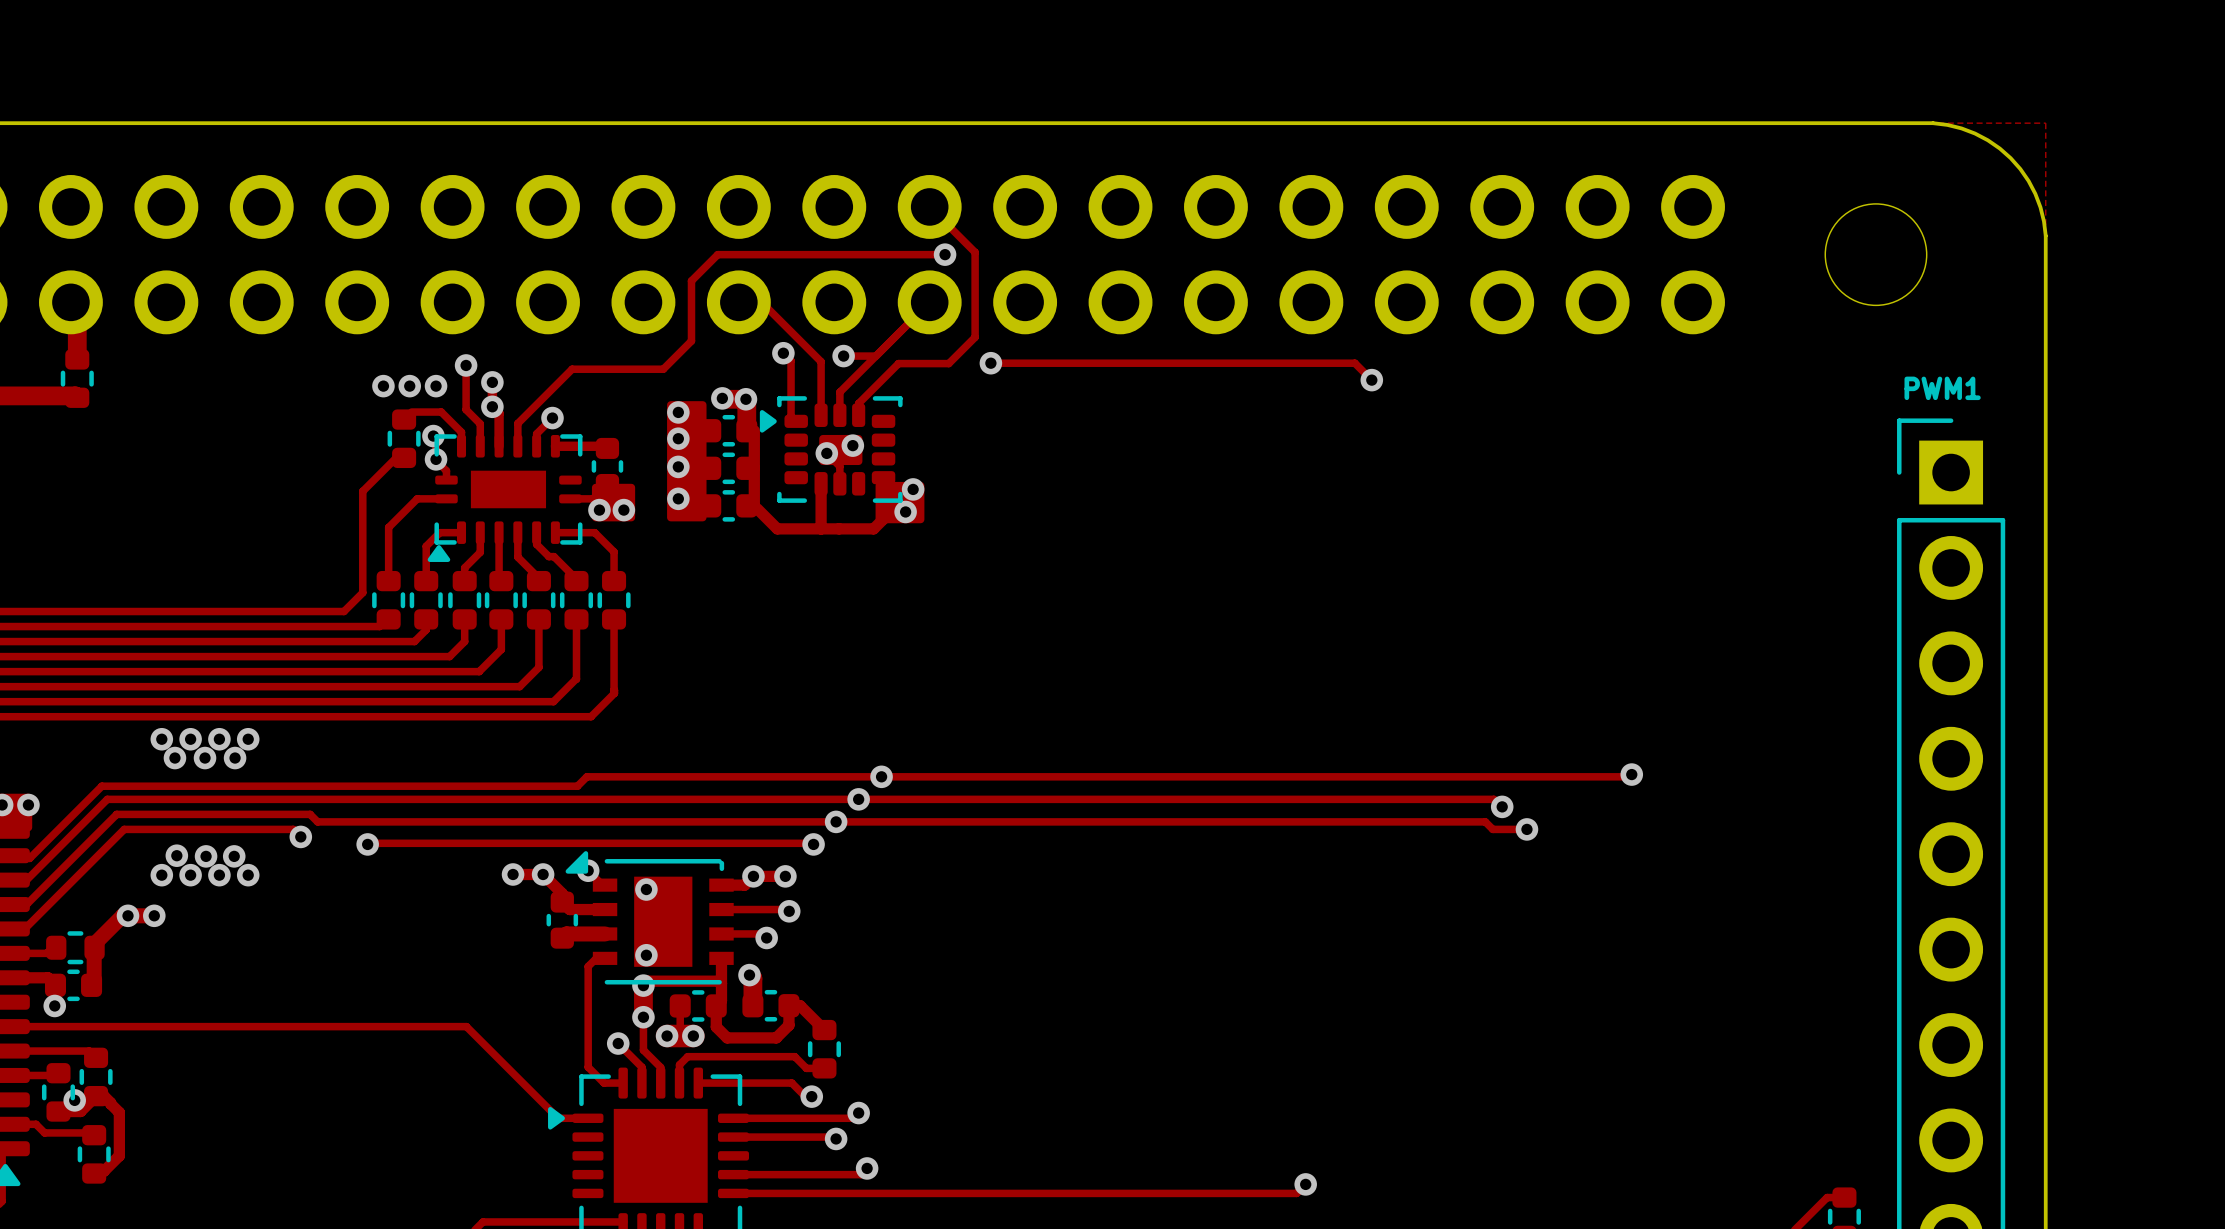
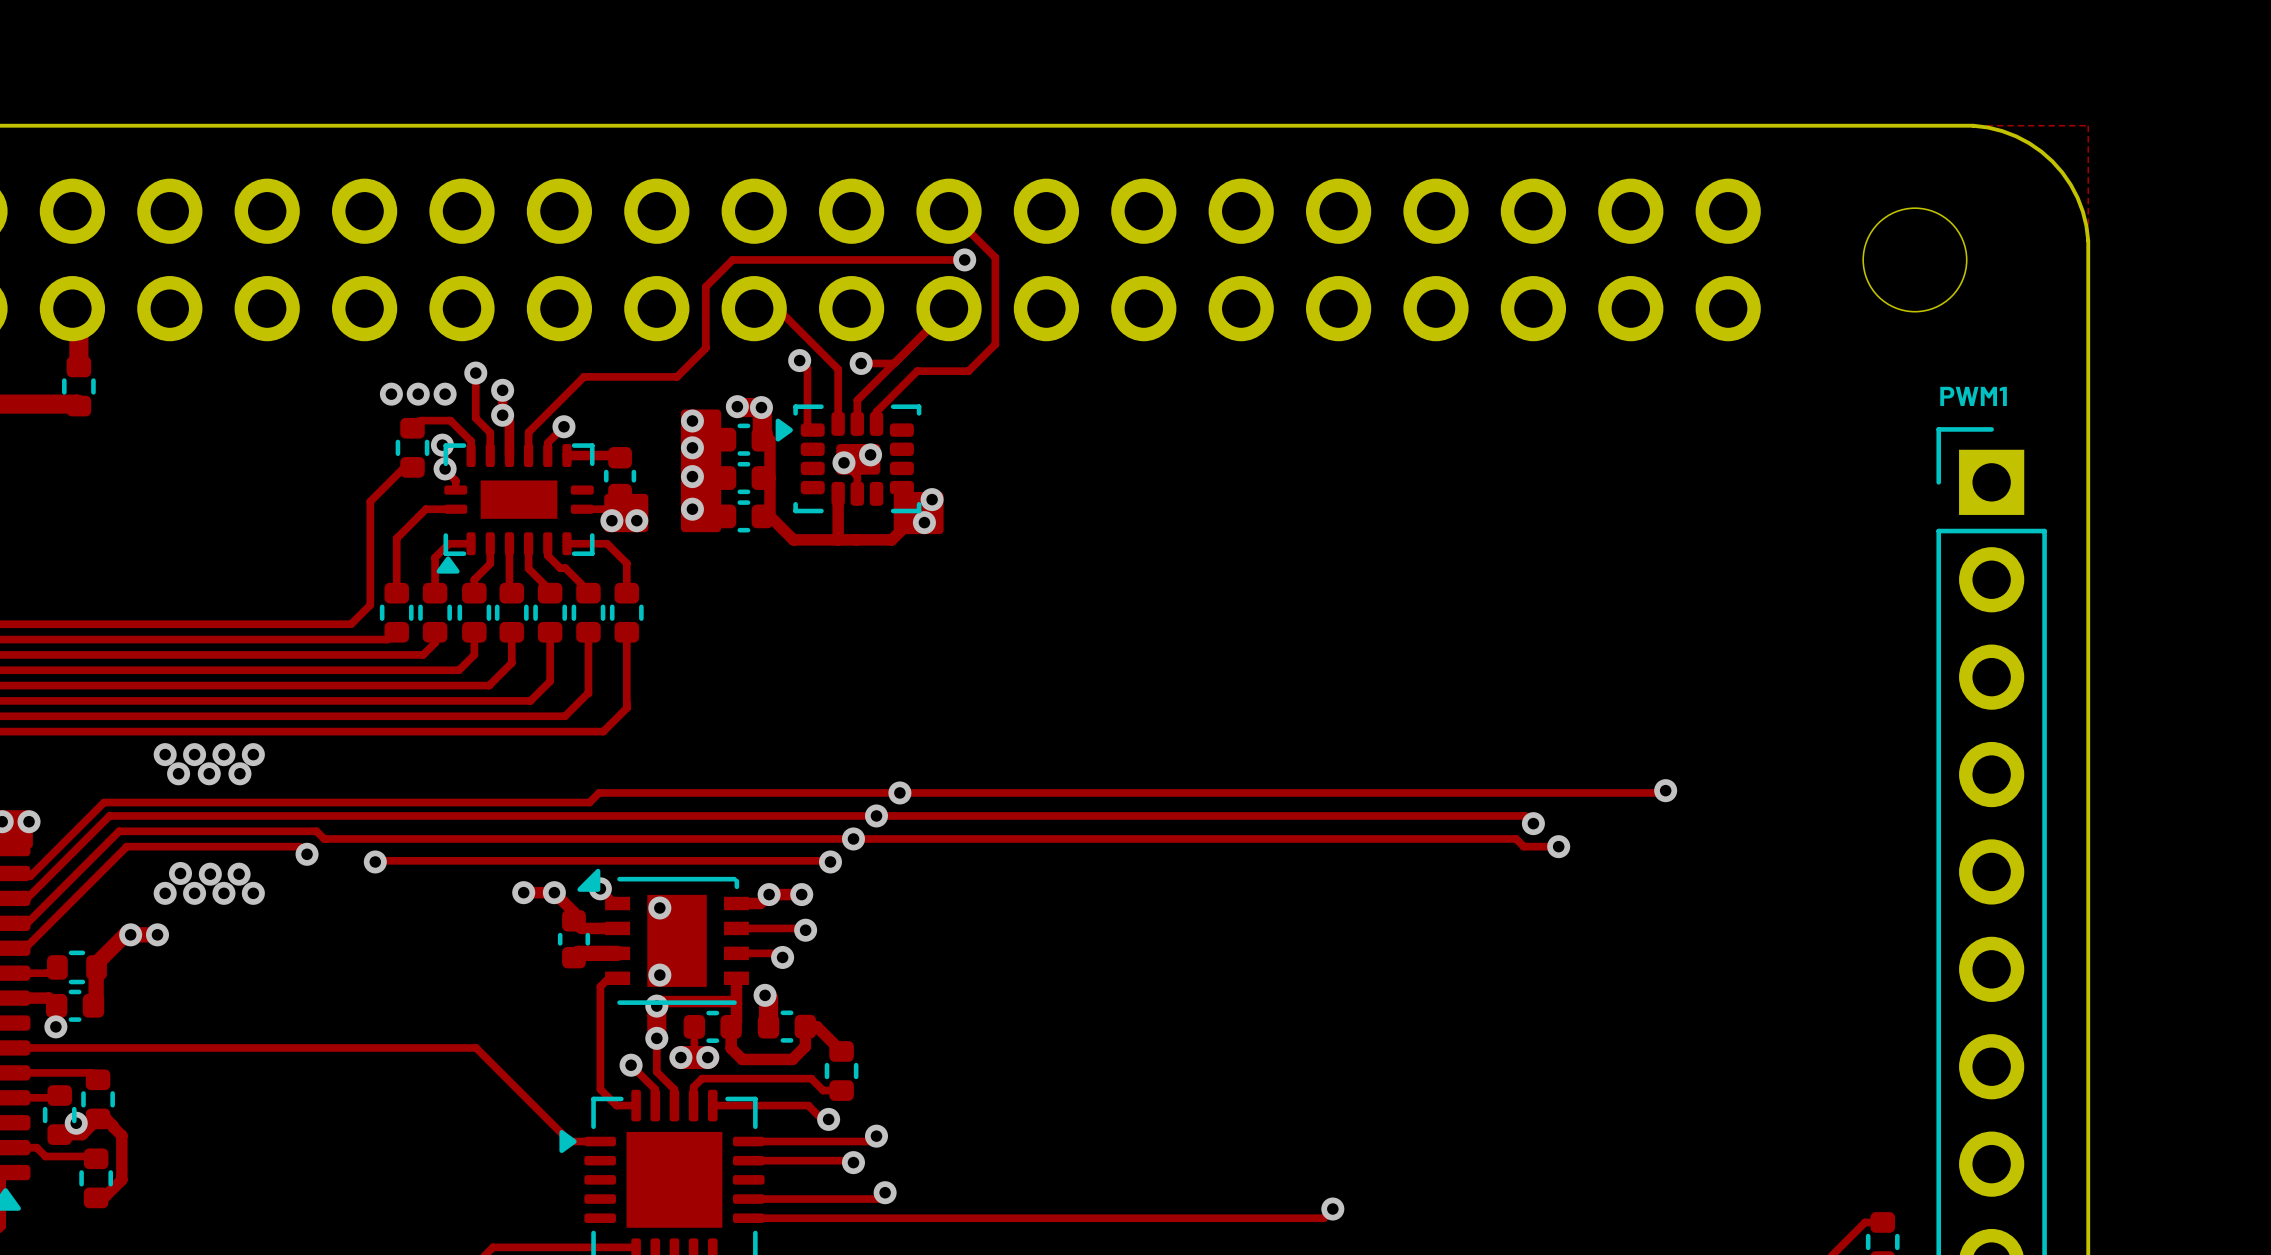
track: (990, 363) (1354, 363) (1371, 380) -> none
via: (990, 363) -> none
via: (1371, 380) -> none

